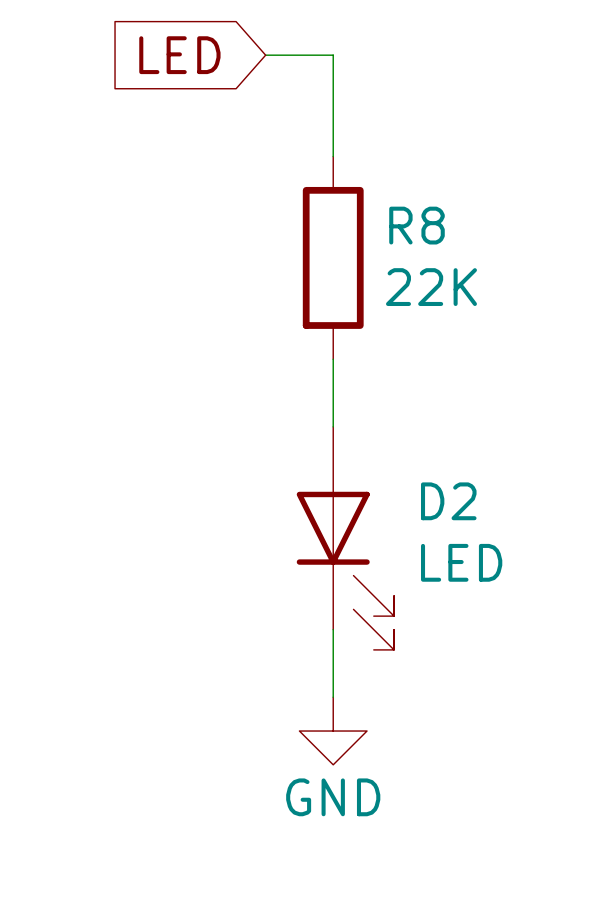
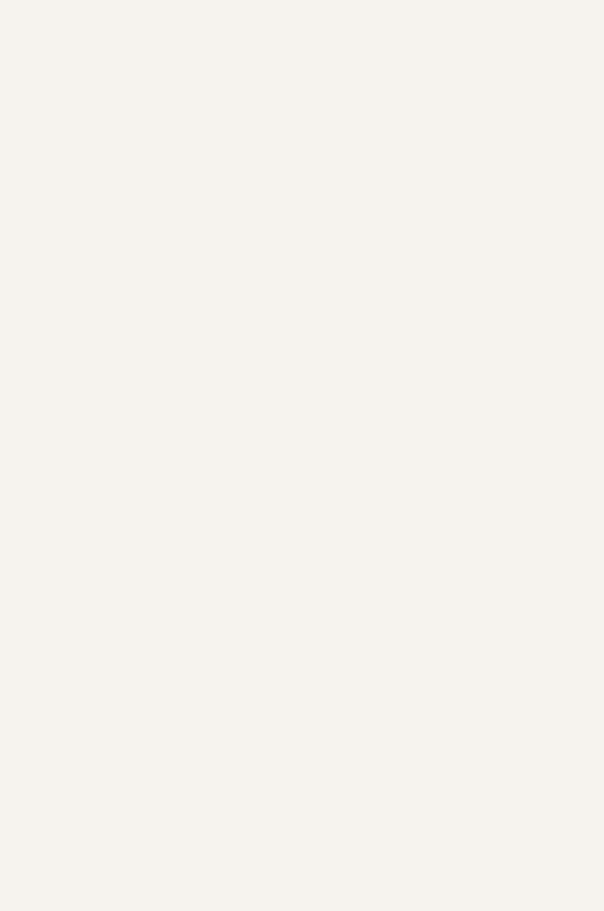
global label: LED (179, 55) -> none
wire: (265, 55) (333, 55) (333, 156) -> none
R8: 22K (333, 257) -> none
wire: (333, 359) (333, 426) -> none
D2: LED (345, 538) -> none
wire: (333, 629) (333, 697) -> none
power symbol: GND (333, 731) -> none

